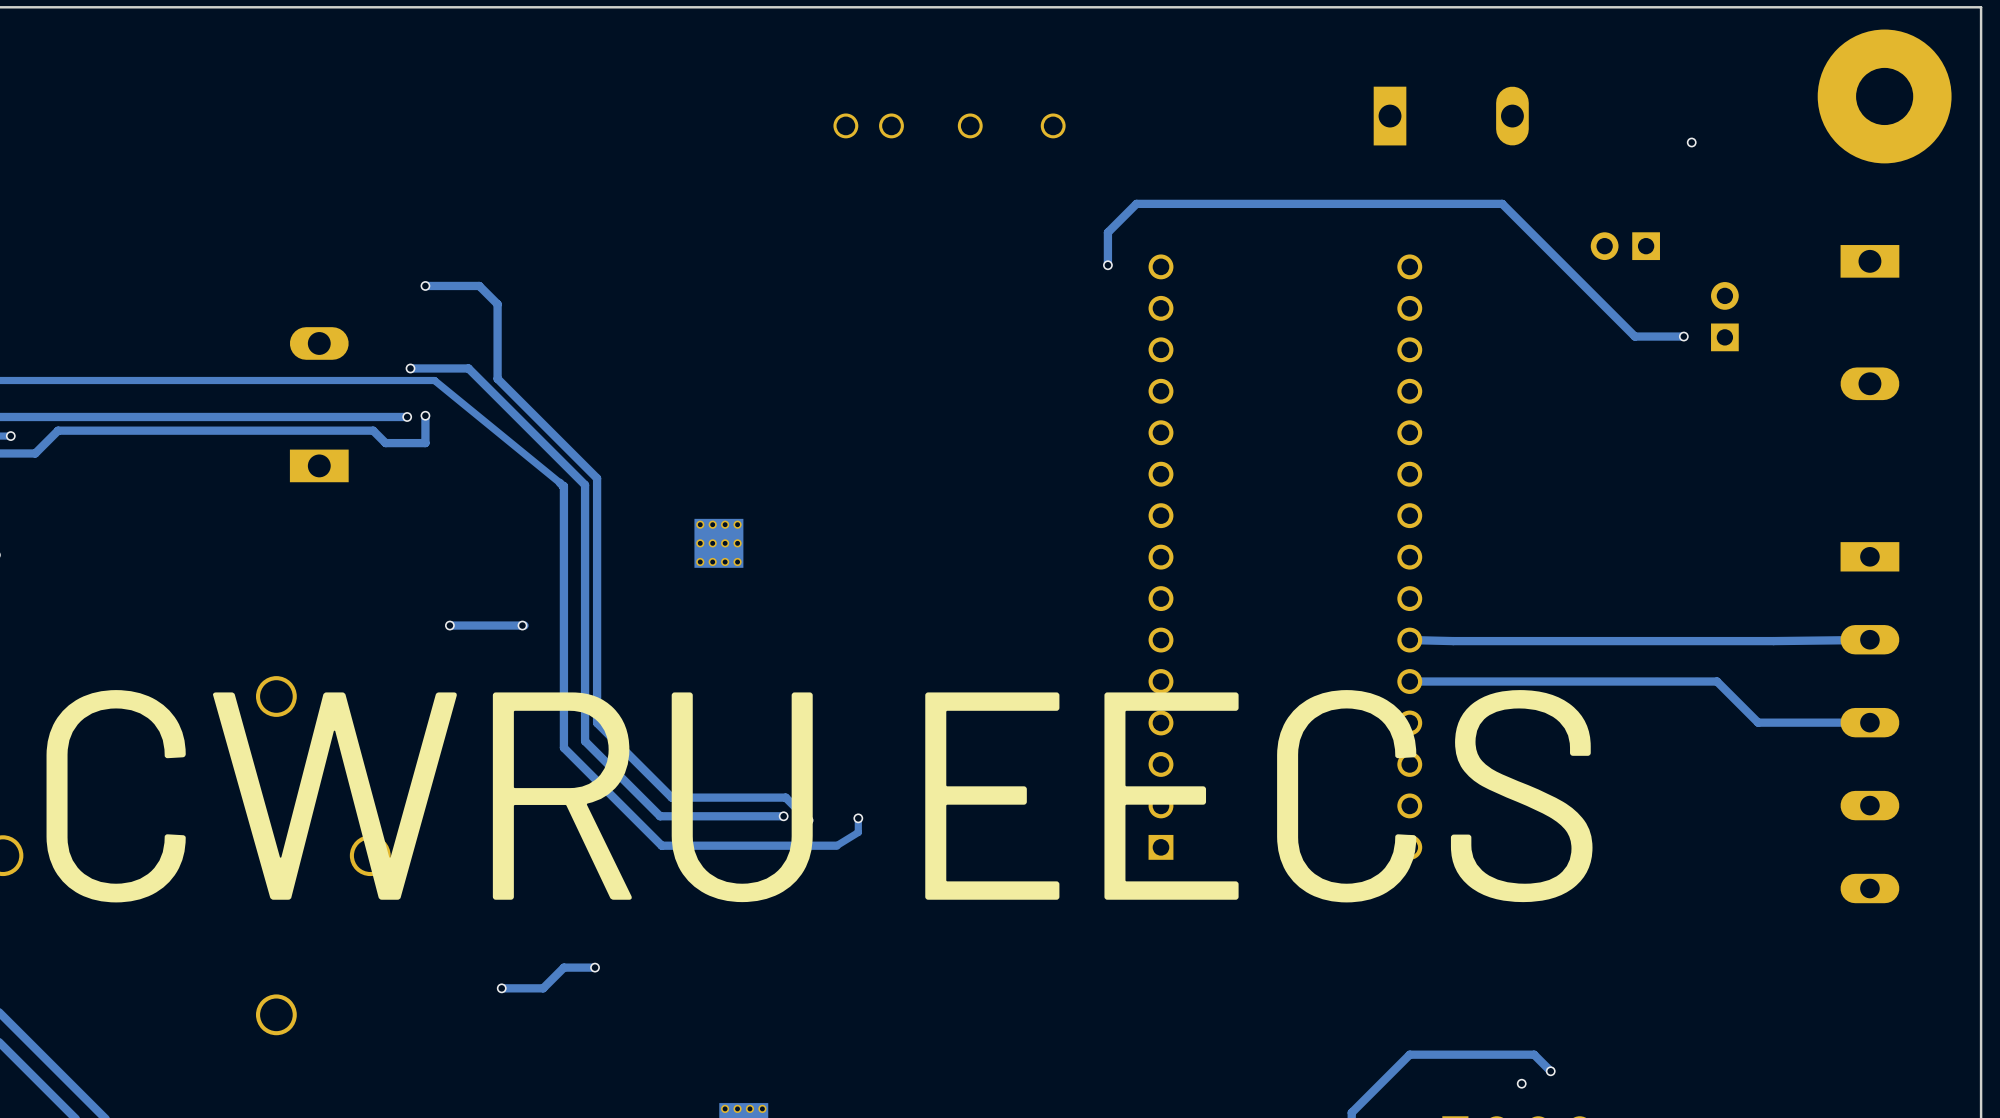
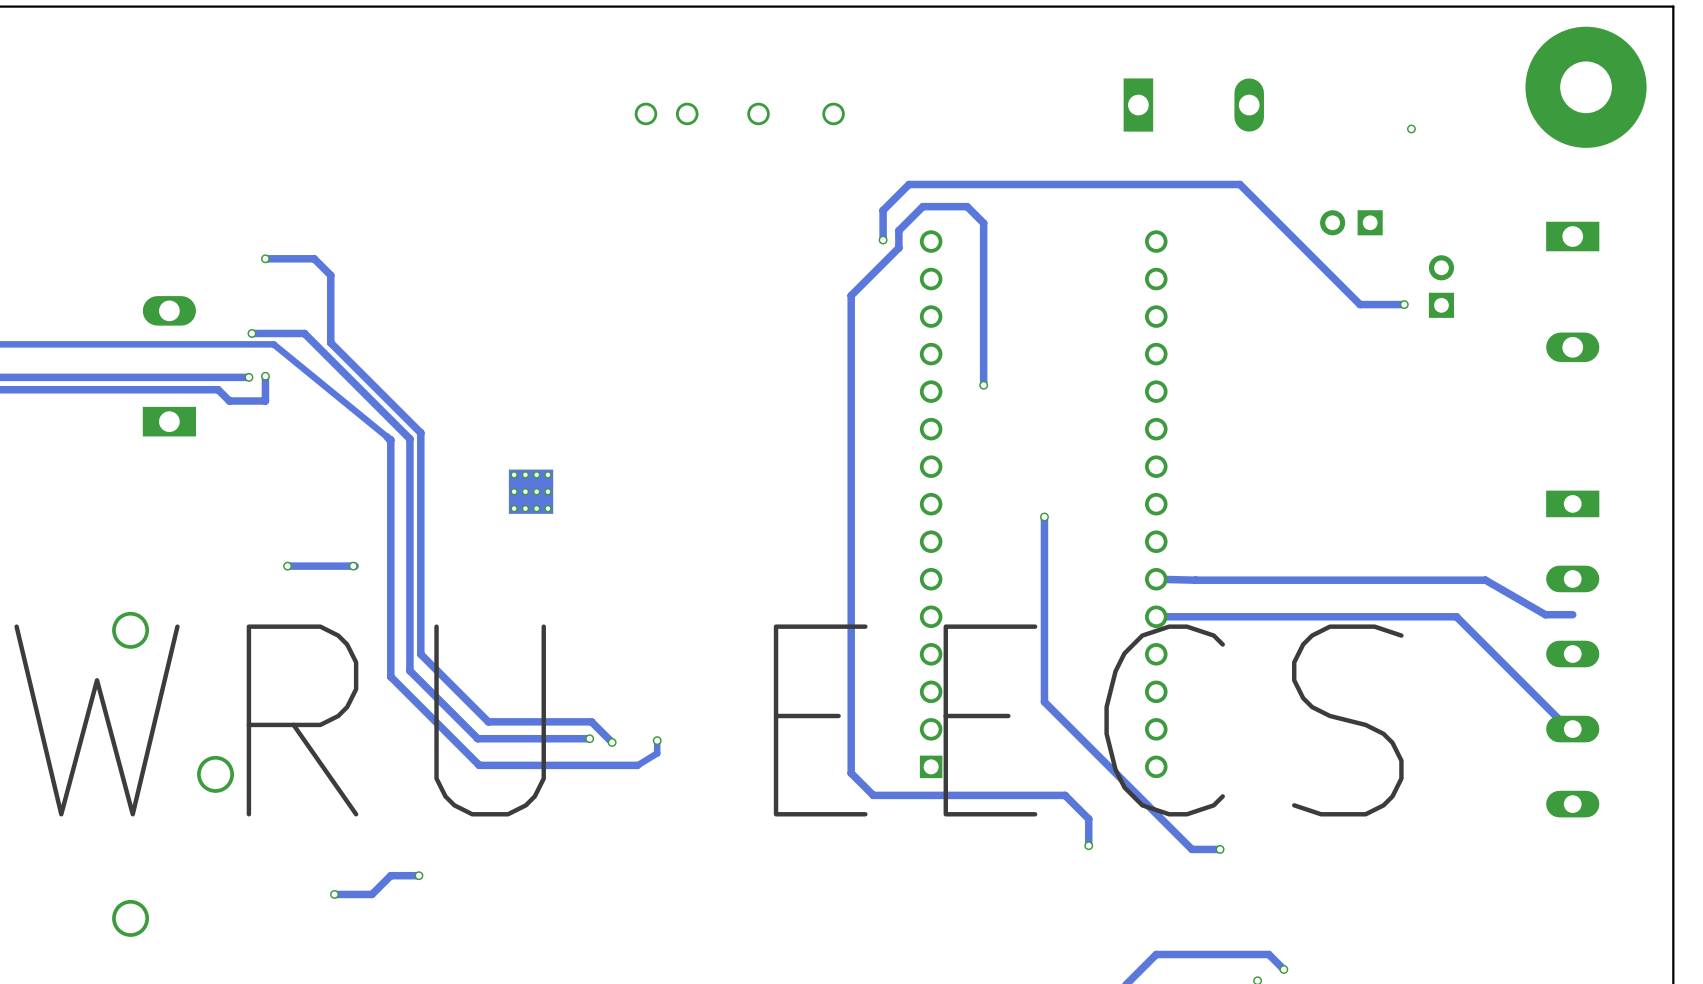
track: none -> (983, 385) (983, 223) (967, 206) (922, 206) (898, 230) (898, 247) (851, 295) (851, 773) (873, 795) (1065, 795) (1088, 819) (1088, 845)
via: none -> (983, 385)
track: none -> (1044, 516) (1044, 701) (1191, 849) (1220, 849)
via: none -> (1044, 516)
track: (1874, 640) (1773, 641) -> (1572, 614) (1545, 614) (1485, 580)
track: (1717, 681) (1758, 722) (1869, 722) -> (1434, 616) (1456, 616) (1565, 725)
via: none -> (1088, 845)
via: none -> (1220, 849)

